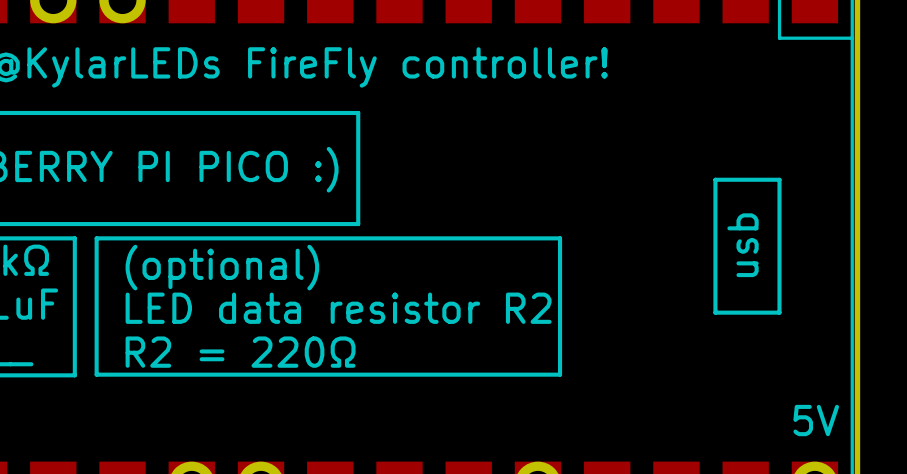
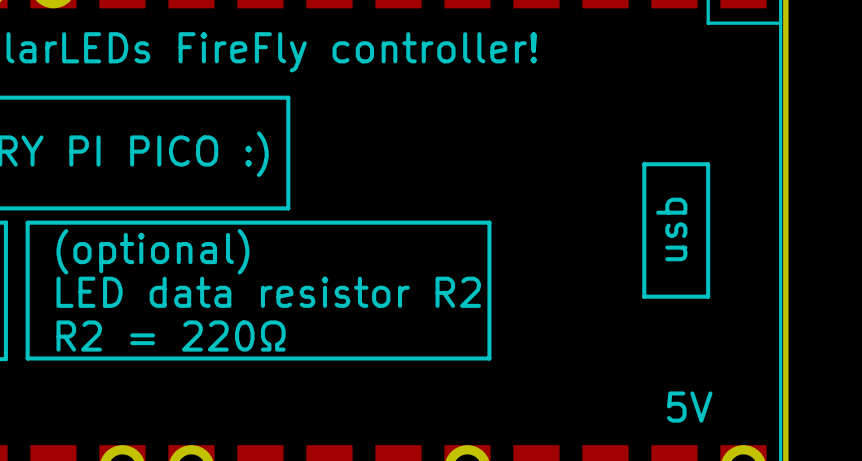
text position: 5V (816, 420) -> 5V (689, 407)

